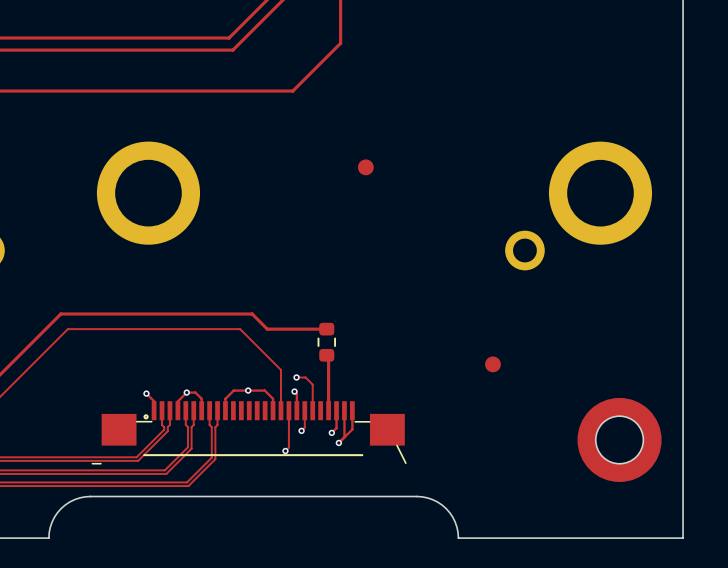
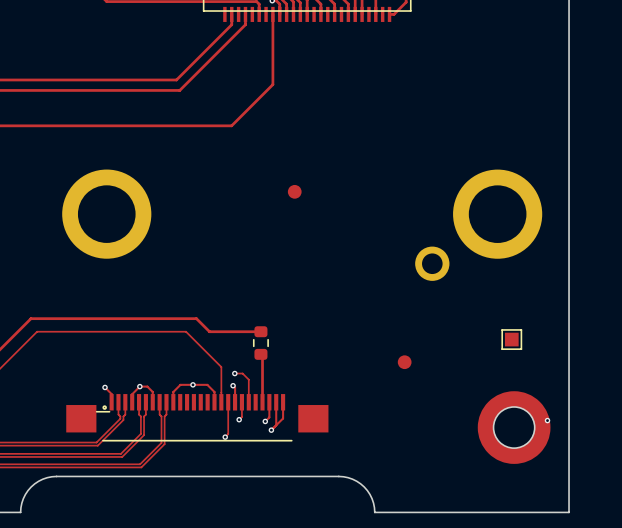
part: none -> (511, 339)
part footprint: [91, 401, 407, 465] -> [66, 394, 329, 442]
via: none -> (547, 420)

